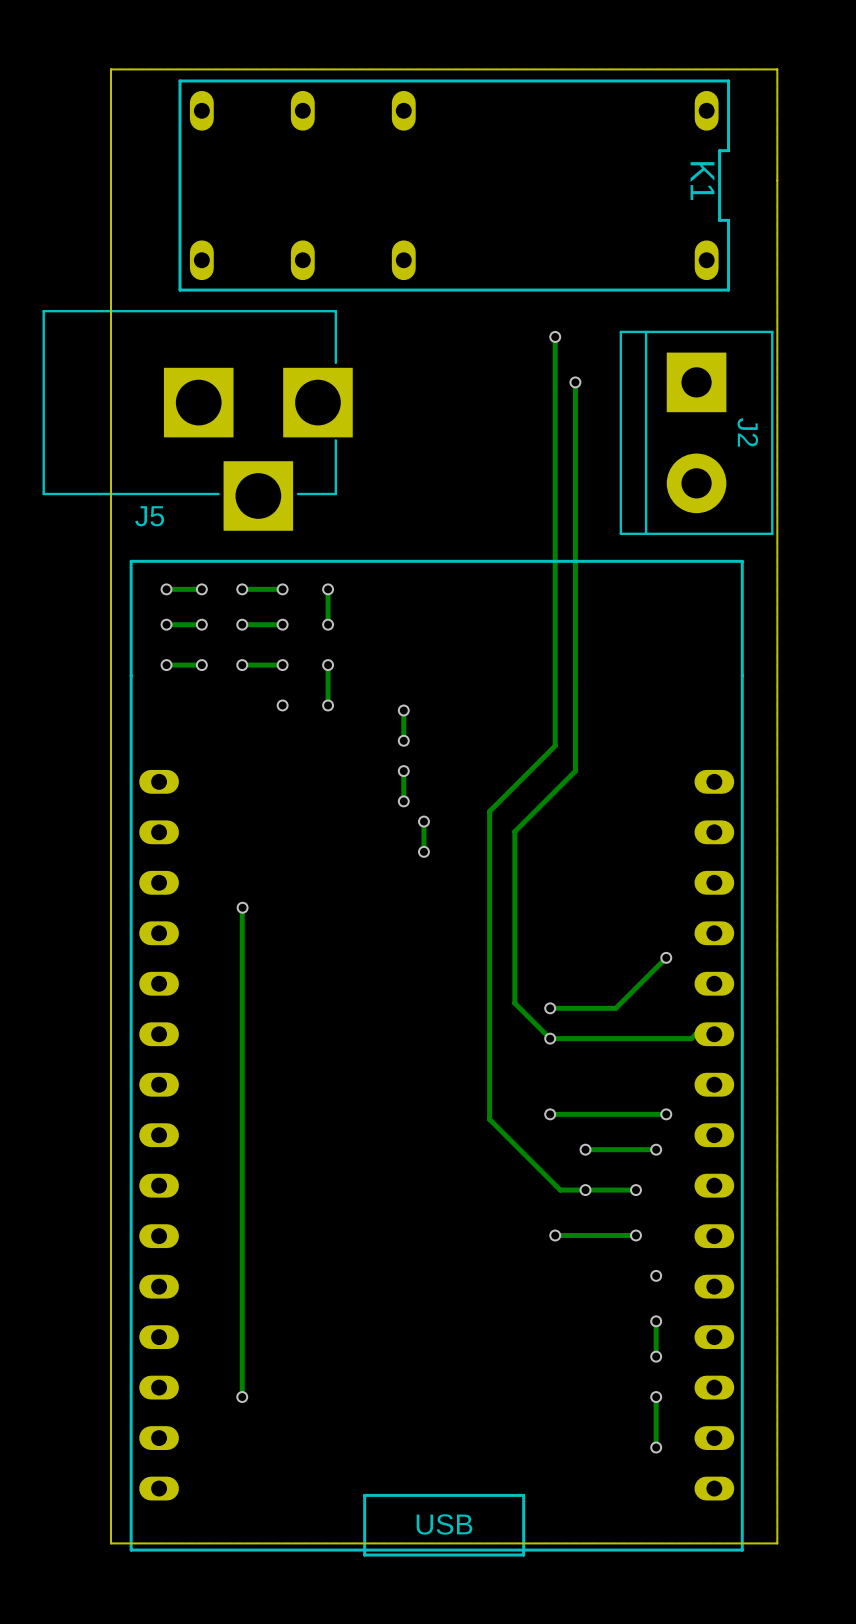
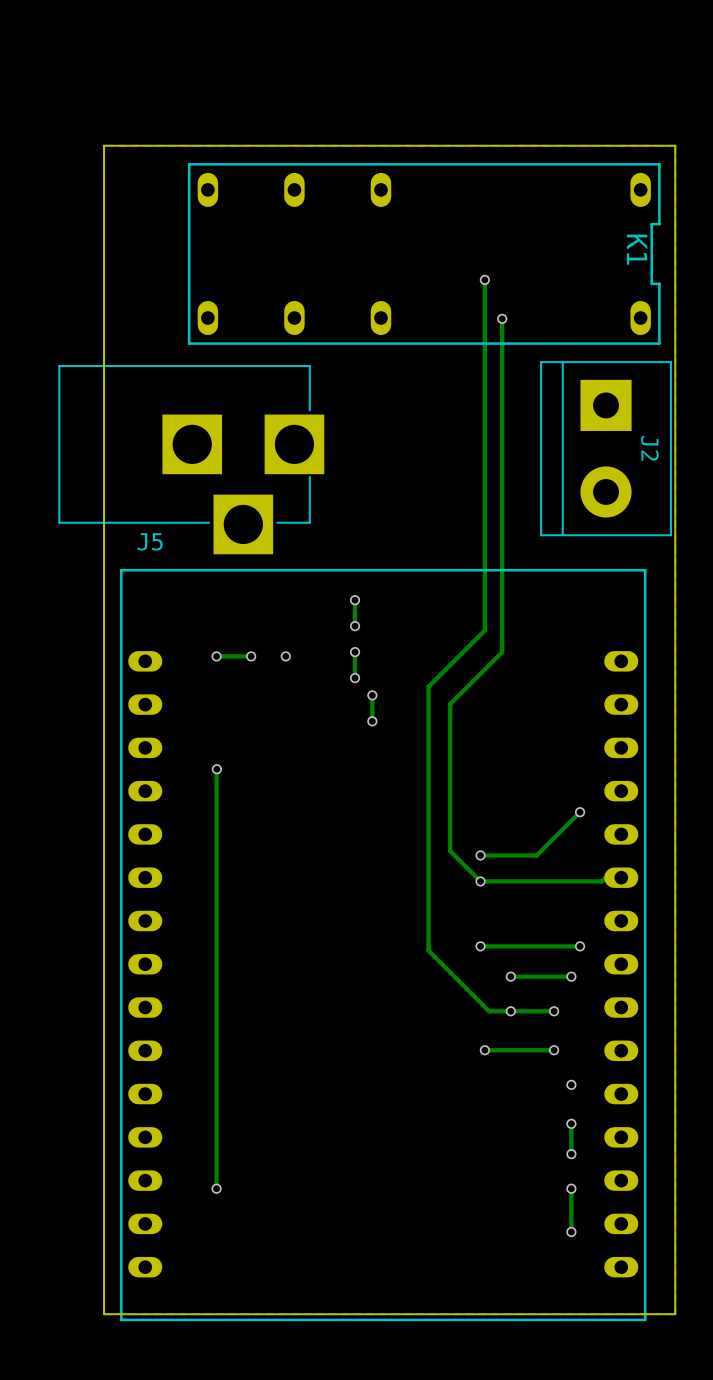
board edge: (777, 180) (777, 69) (111, 69) (111, 180) -> (675, 145) (104, 145)
K1 position: (454, 185) -> (424, 253)
J5 position: (197, 420) -> (191, 459)
J2 position: (696, 432) -> (606, 448)
via: (166, 589) -> none
track: (201, 589) (166, 589) -> none
via: (201, 589) -> none
via: (242, 589) -> none
track: (282, 589) (242, 589) -> none
via: (282, 589) -> none
track: (328, 589) (328, 624) -> none
via: (328, 589) -> none
via: (166, 624) -> none
track: (201, 624) (166, 624) -> none
via: (201, 624) -> none
via: (242, 624) -> none
track: (282, 624) (242, 624) -> none
via: (282, 624) -> none
via: (328, 624) -> none
via: (166, 665) -> none
track: (201, 665) (166, 665) -> none
via: (201, 665) -> none
via: (242, 665) -> none
track: (282, 665) (242, 665) -> (251, 656) (216, 656)
via: (282, 665) -> none
track: (328, 665) (328, 705) -> none
via: (328, 665) -> none
via: (282, 705) -> none
via: (328, 705) -> none
via: none -> (216, 656)
via: none -> (251, 656)
via: none -> (285, 656)
part: (436, 1058) -> none
part: none -> (383, 945)

